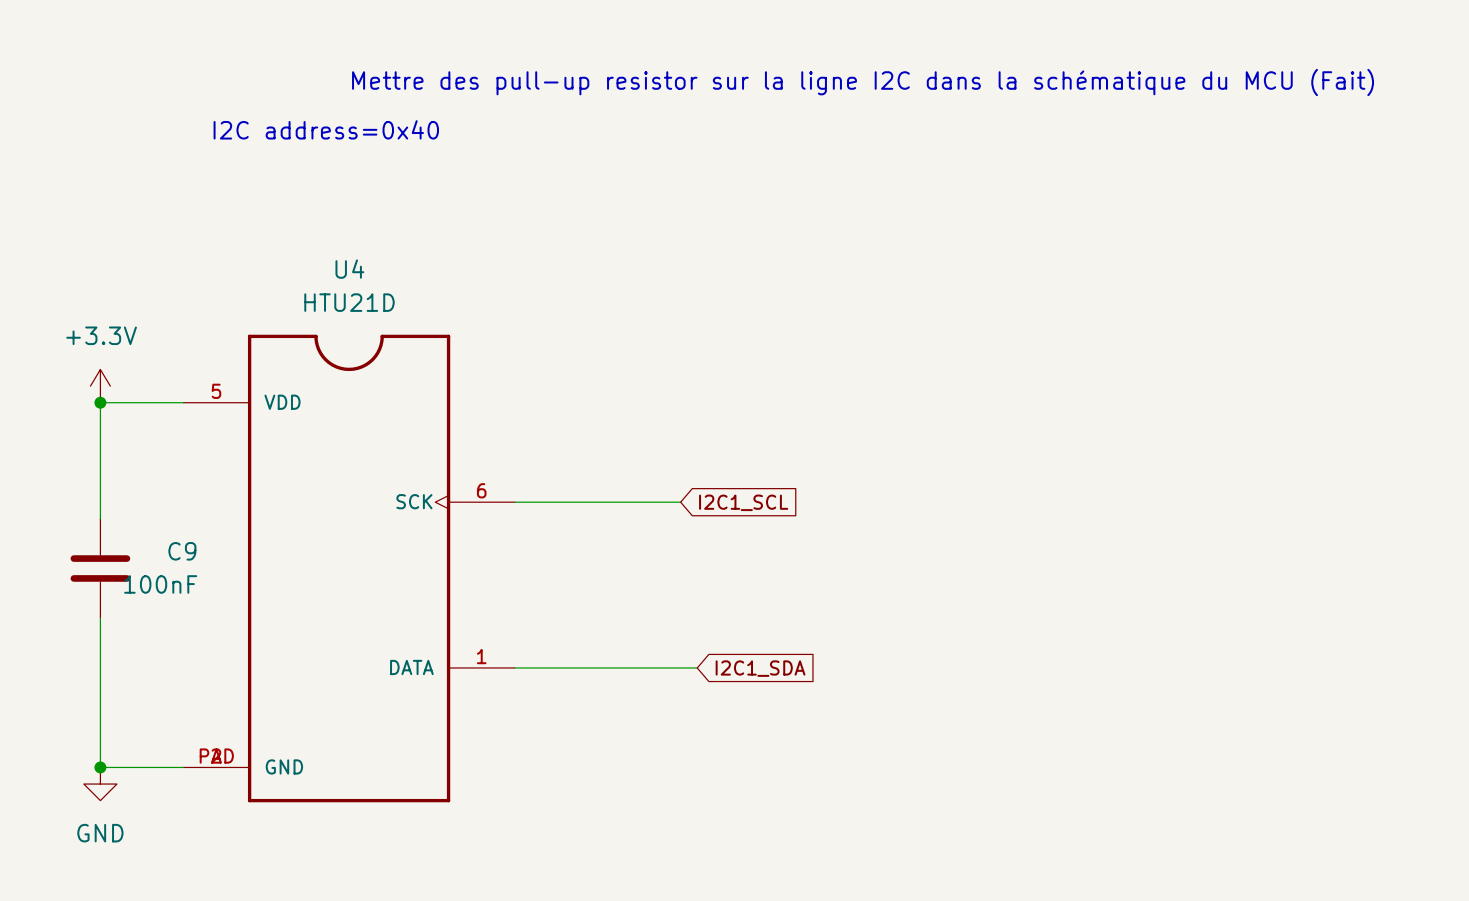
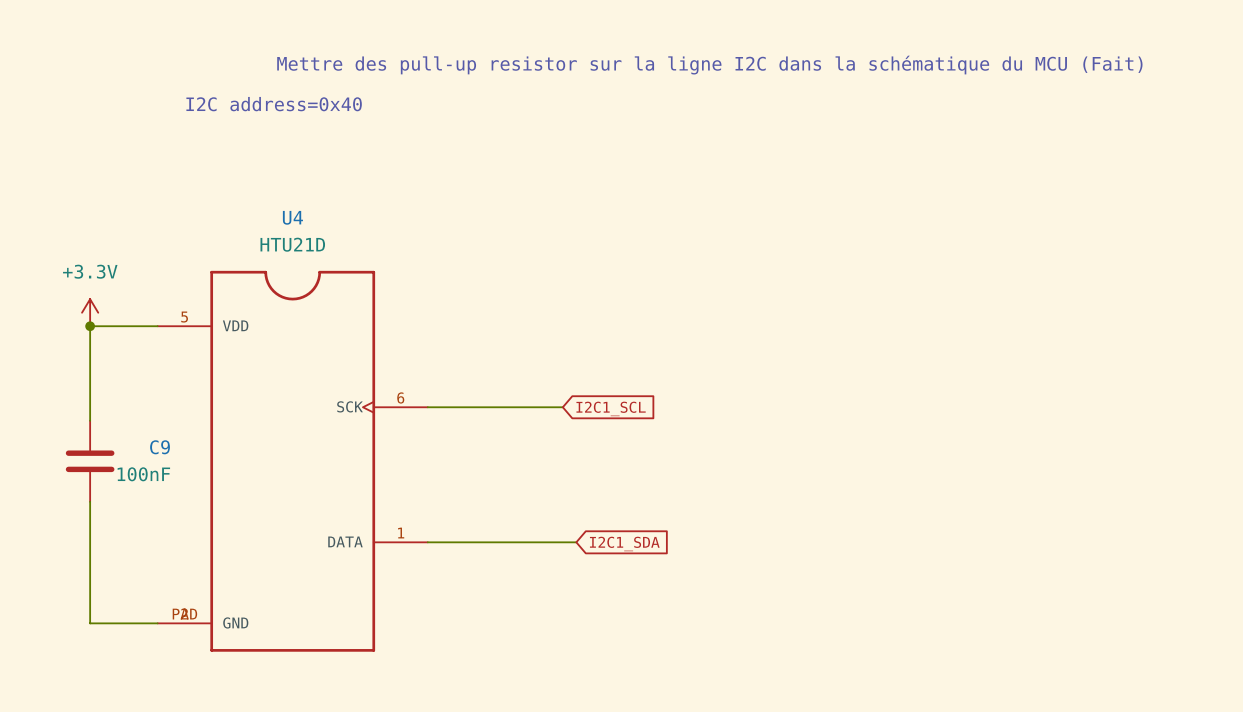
junction: (100, 767) -> none
power symbol: GND (100, 784) -> none

